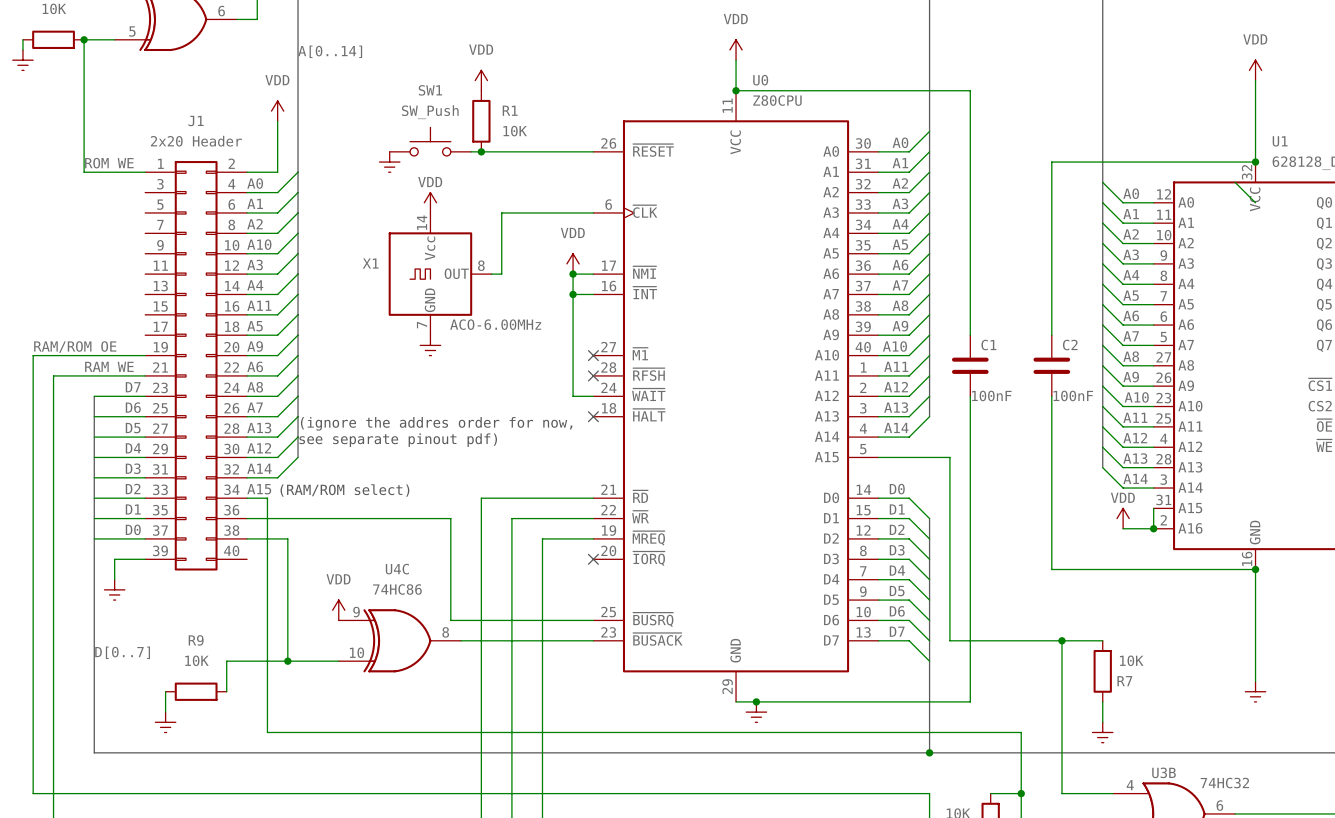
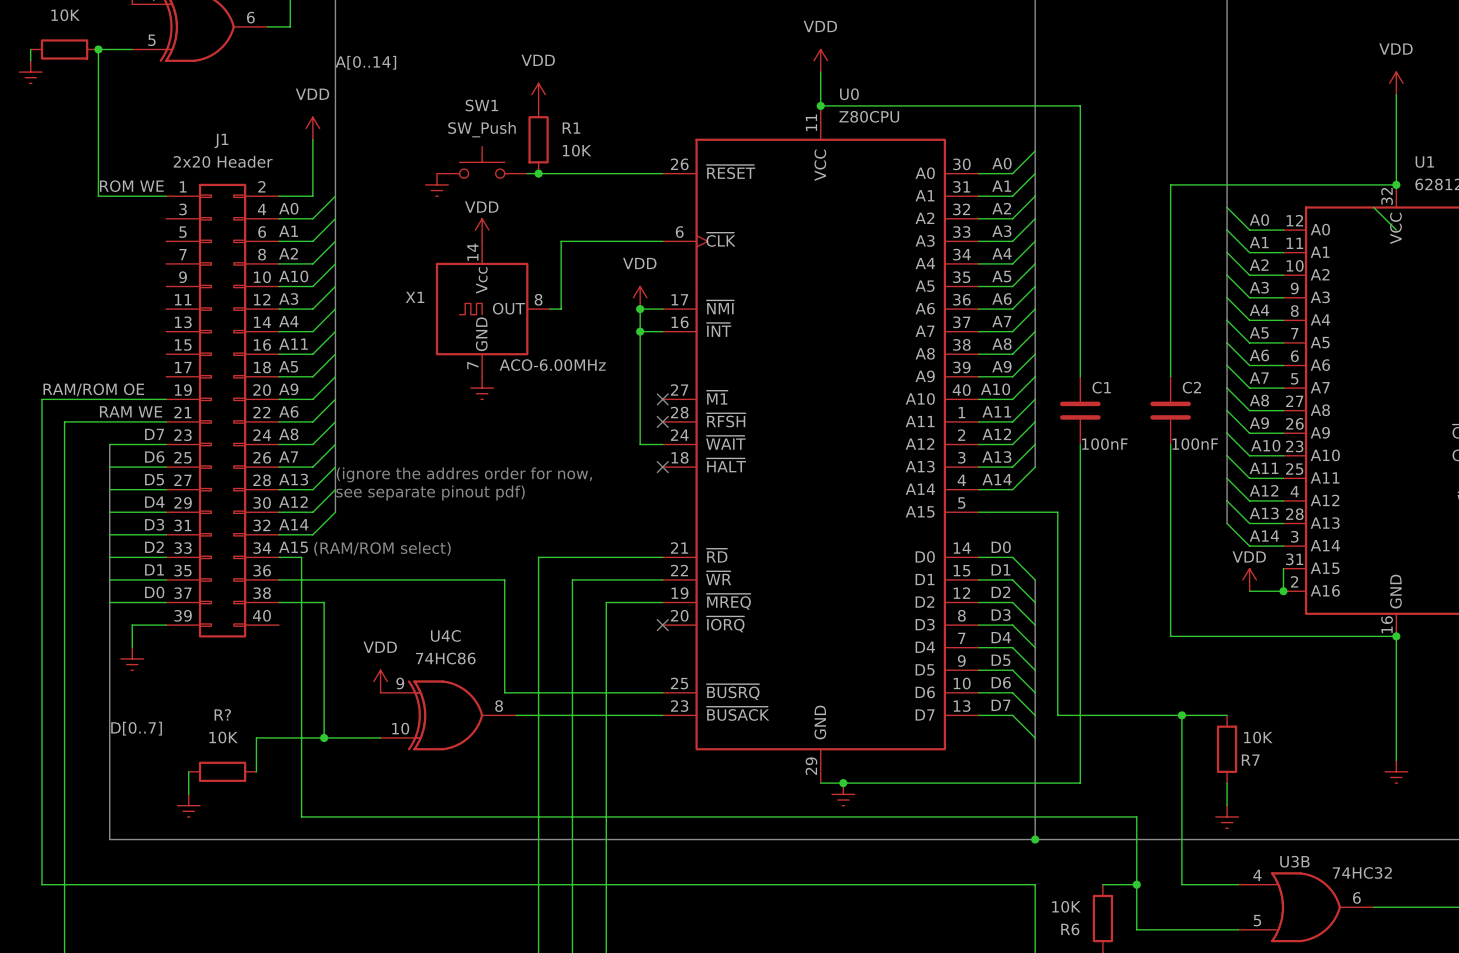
R9 name: R9 (196, 640) -> R? (222, 714)

